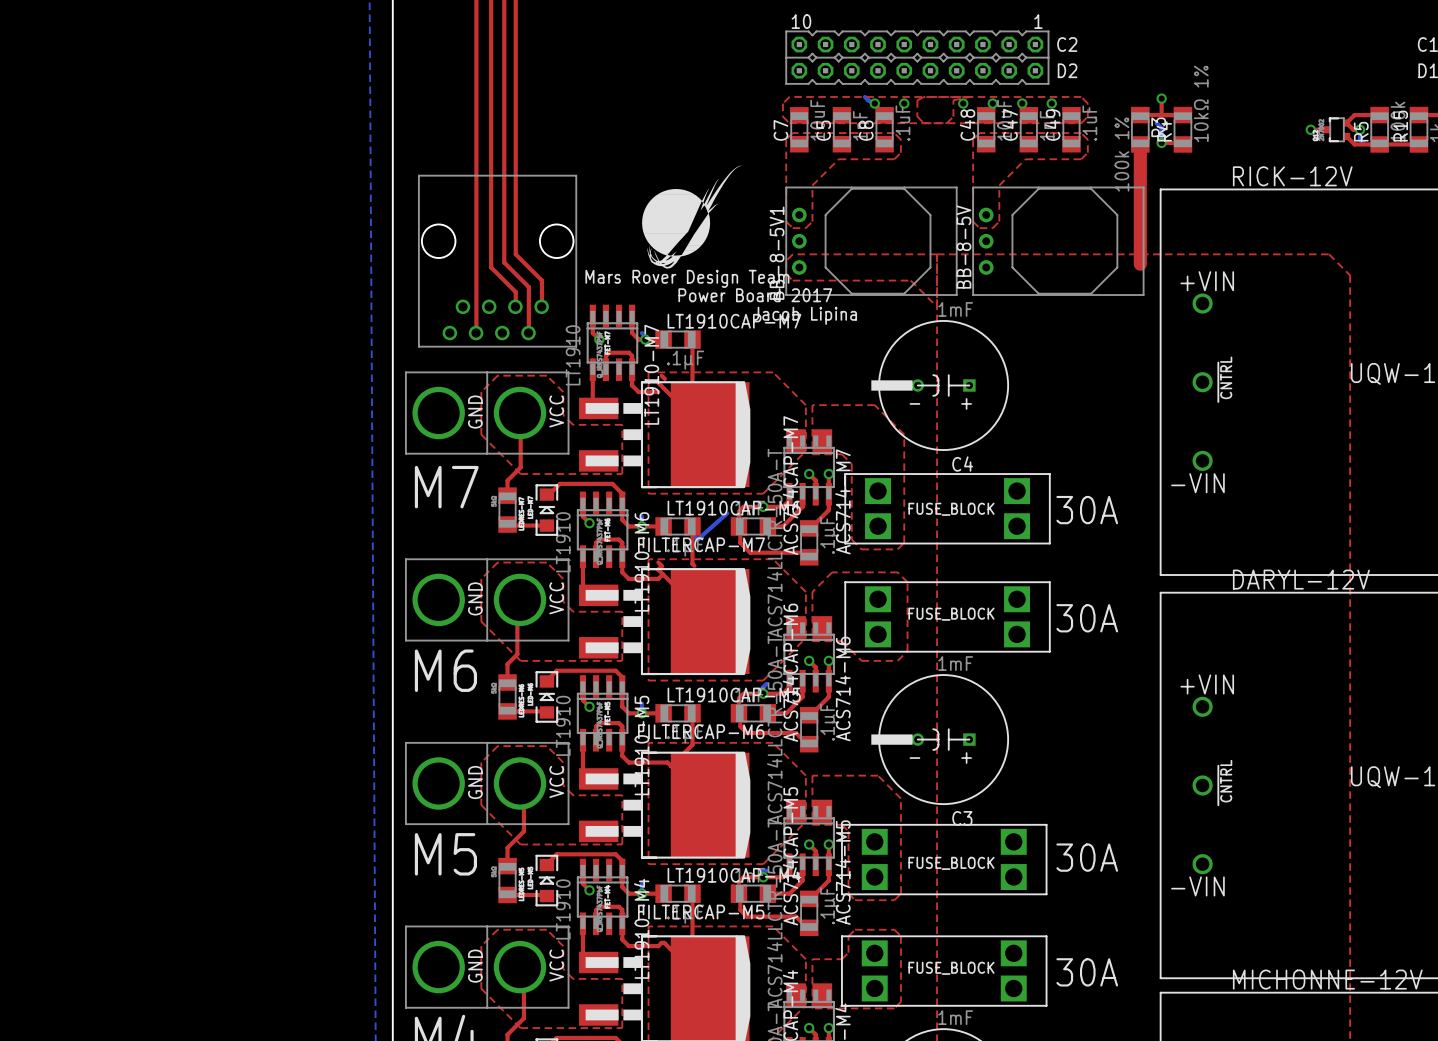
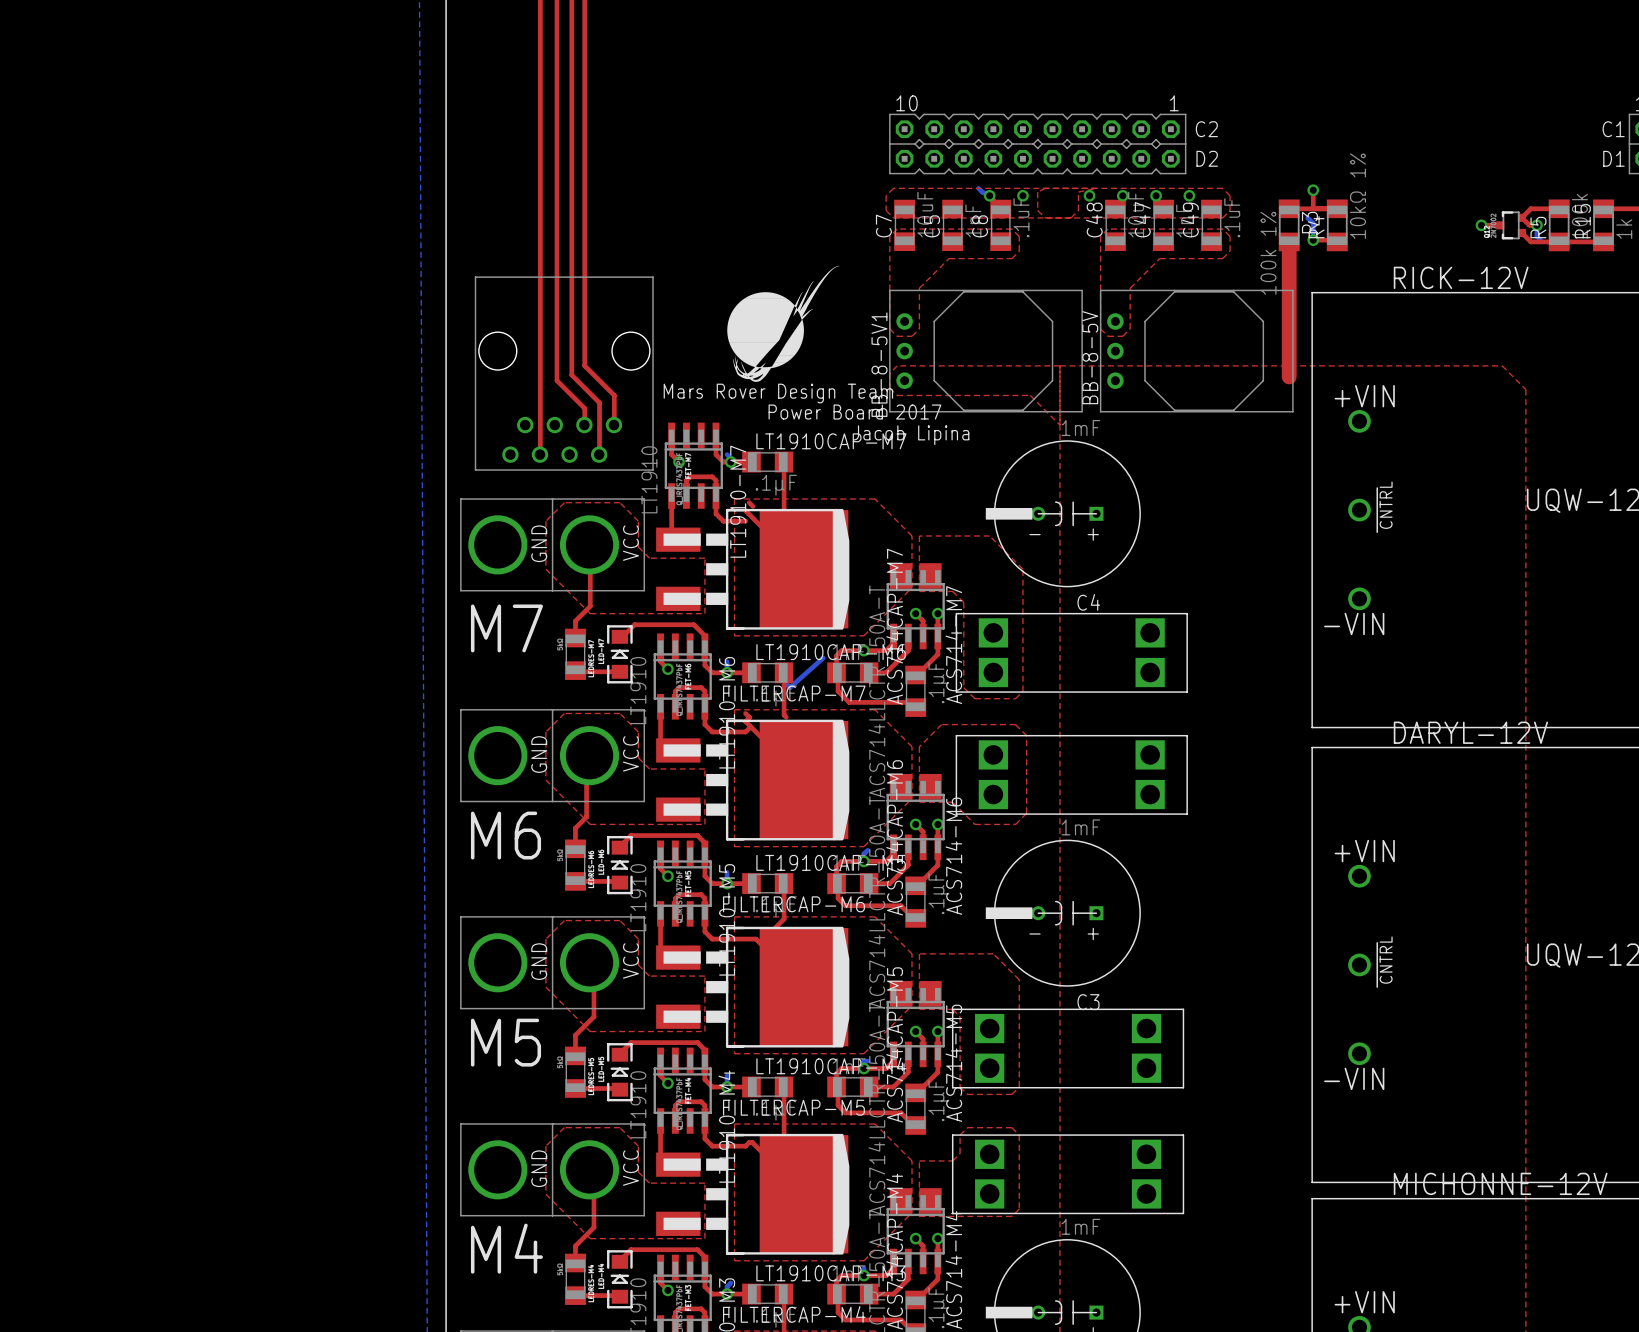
text: FUSE_BLOCK (951, 509) -> none
text: 30A (1087, 510) -> none
text: FUSE_BLOCK (951, 614) -> none
text: 30A (1087, 618) -> none
text: 30A (1087, 857) -> none
text: FUSE_BLOCK (951, 863) -> none
text: FUSE_BLOCK (951, 968) -> none
text: 30A (1087, 972) -> none

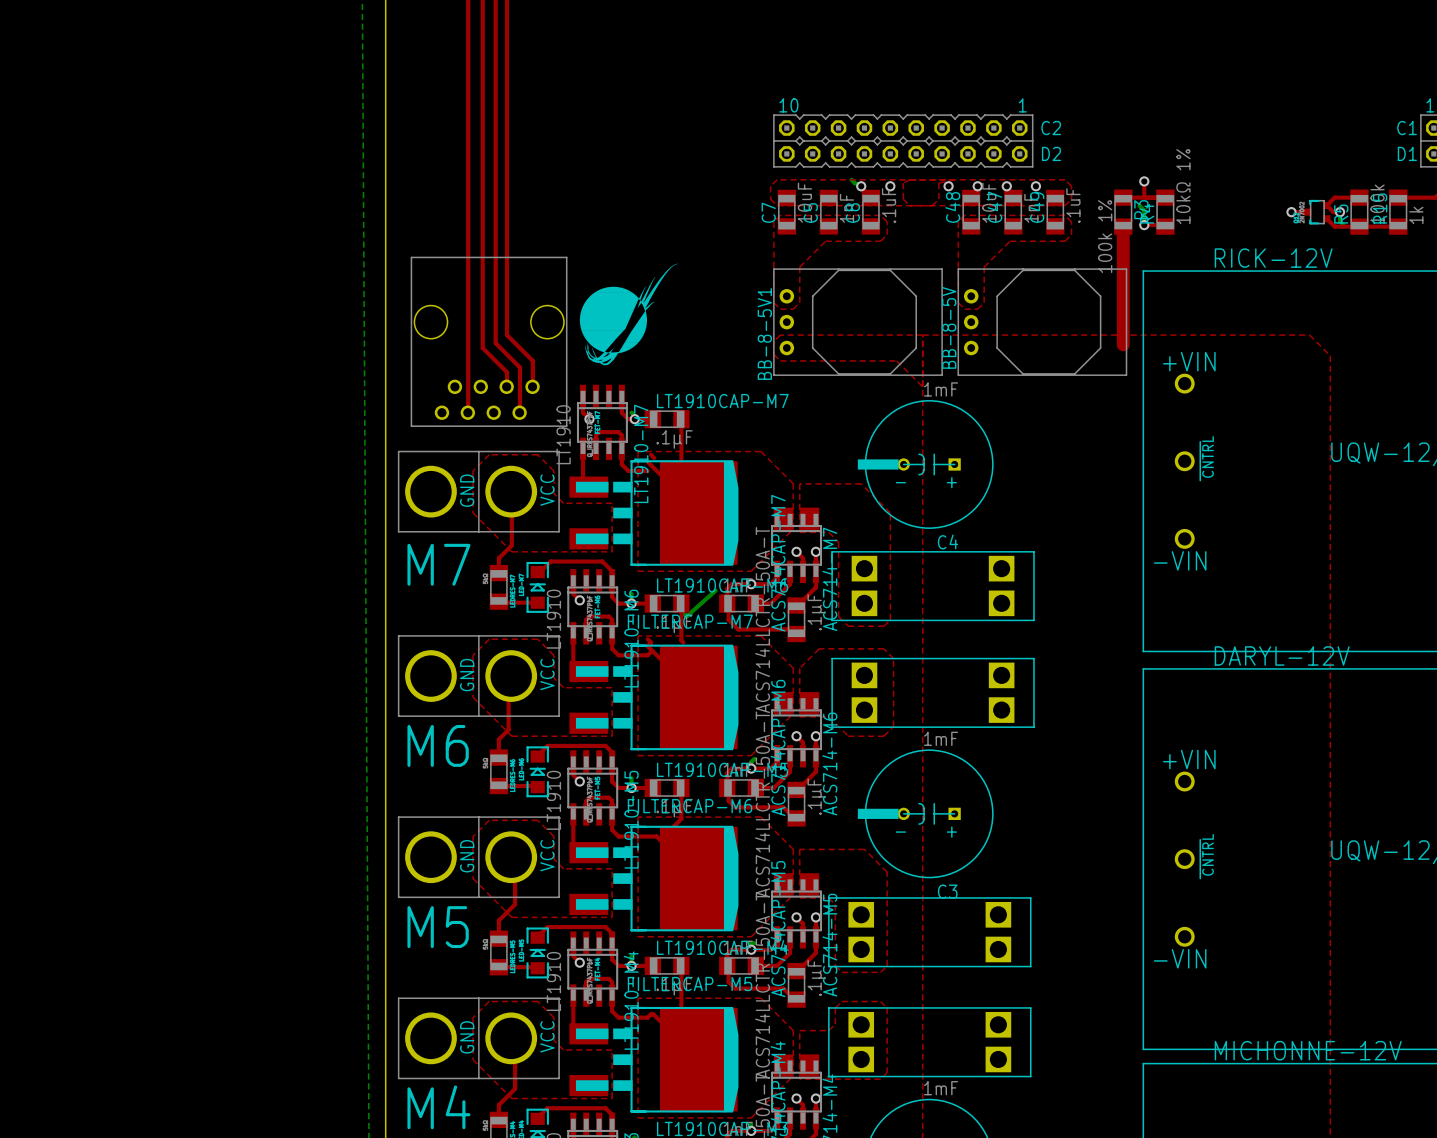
drawing position: (783, 323) -> (629, 314)
text: Mars Rover Design Team (778, 393) -> none
text: Power Board 2017 (854, 412) -> none
text: Jacob Lipina (911, 435) -> none

